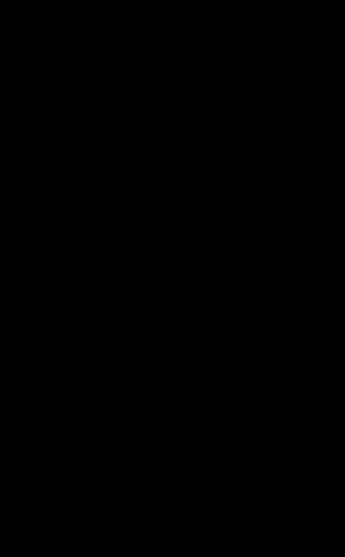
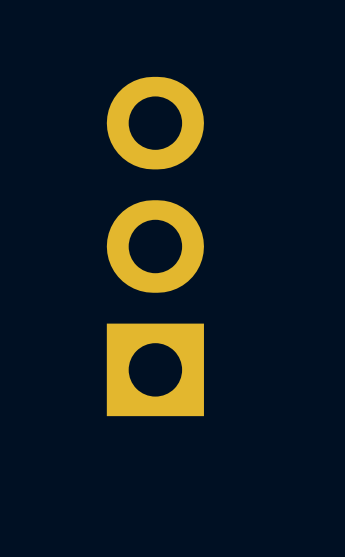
part: none -> (155, 246)

